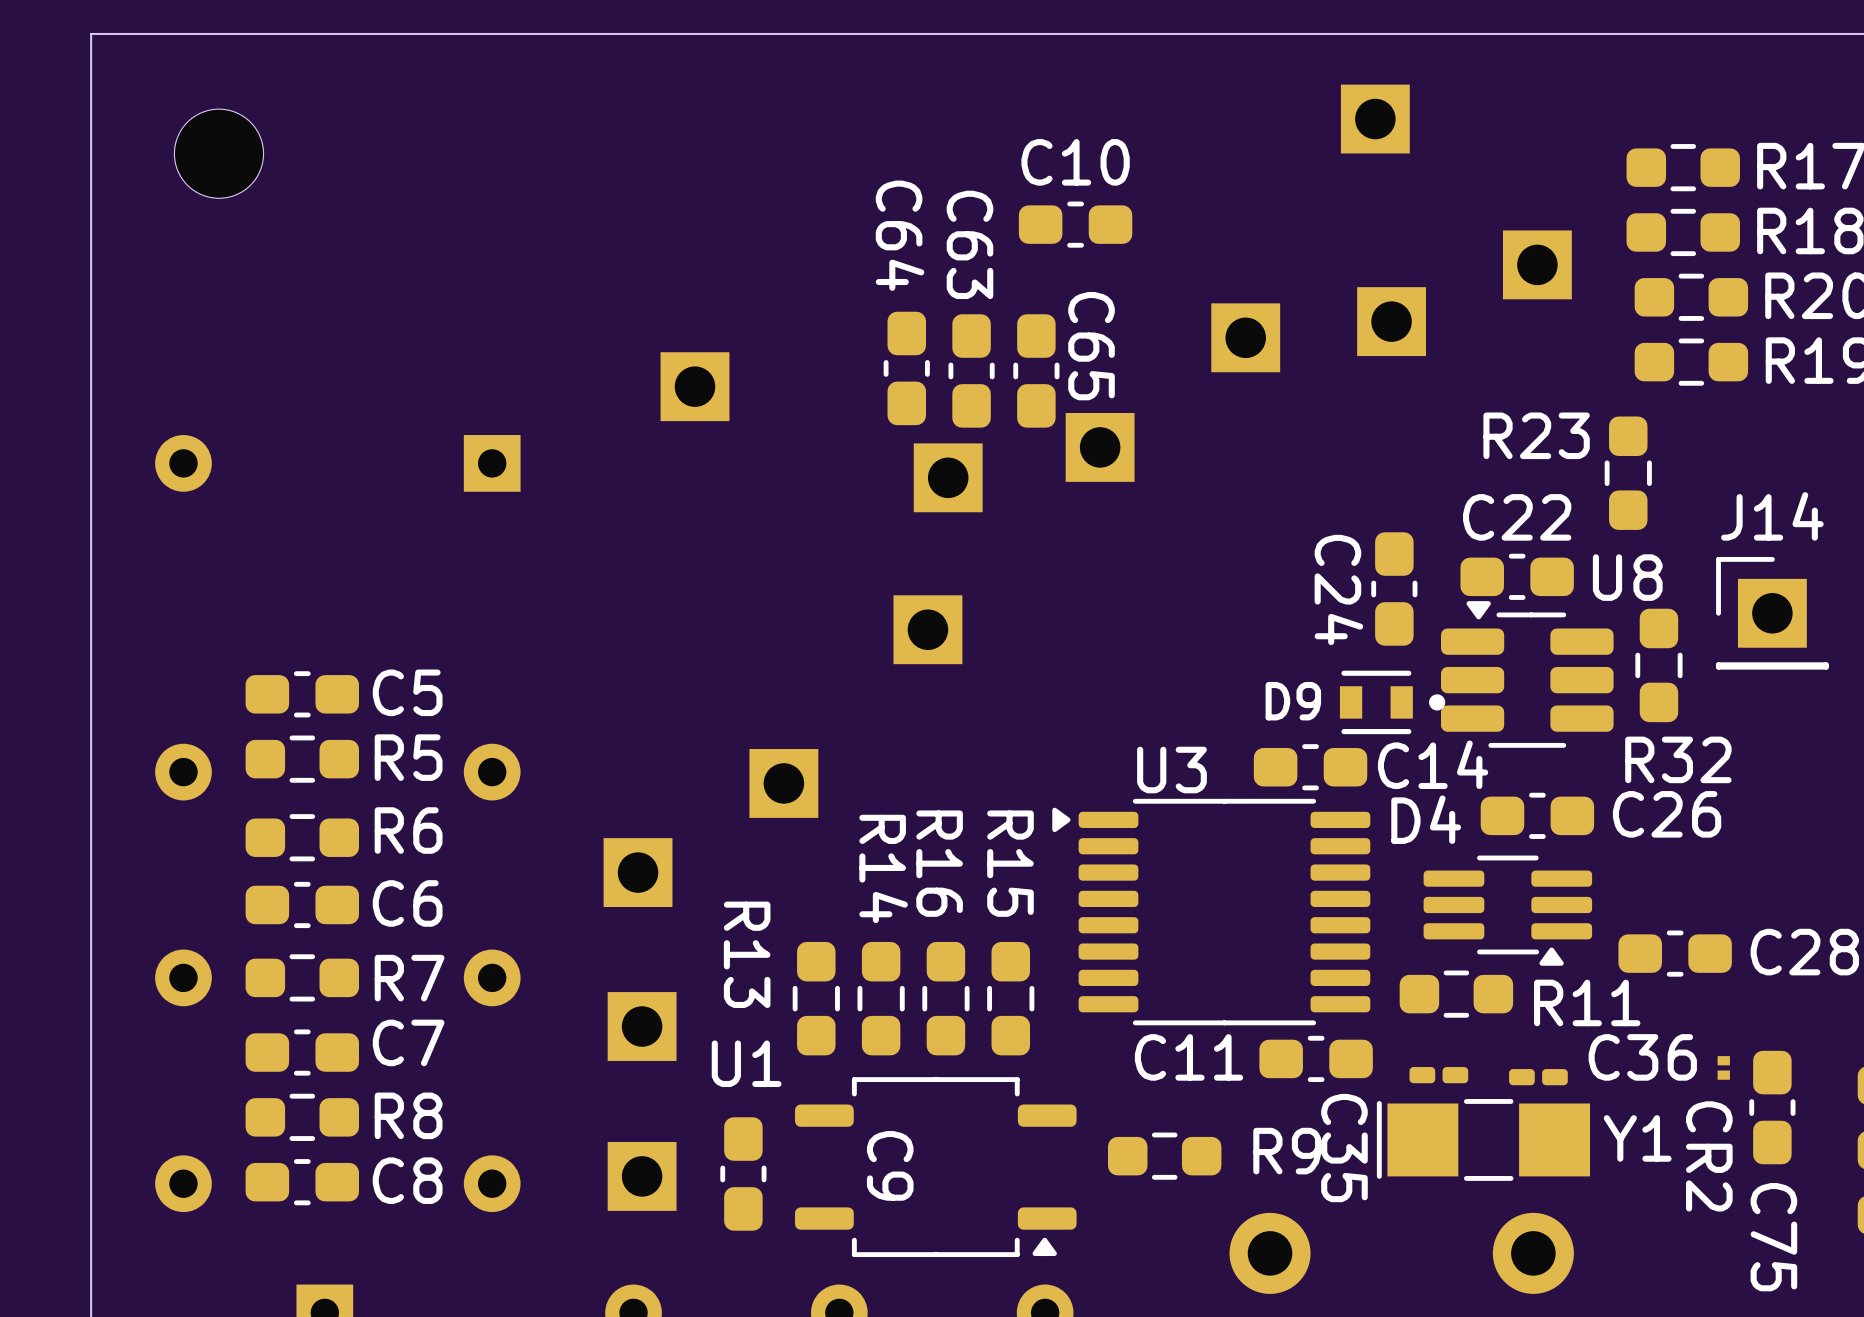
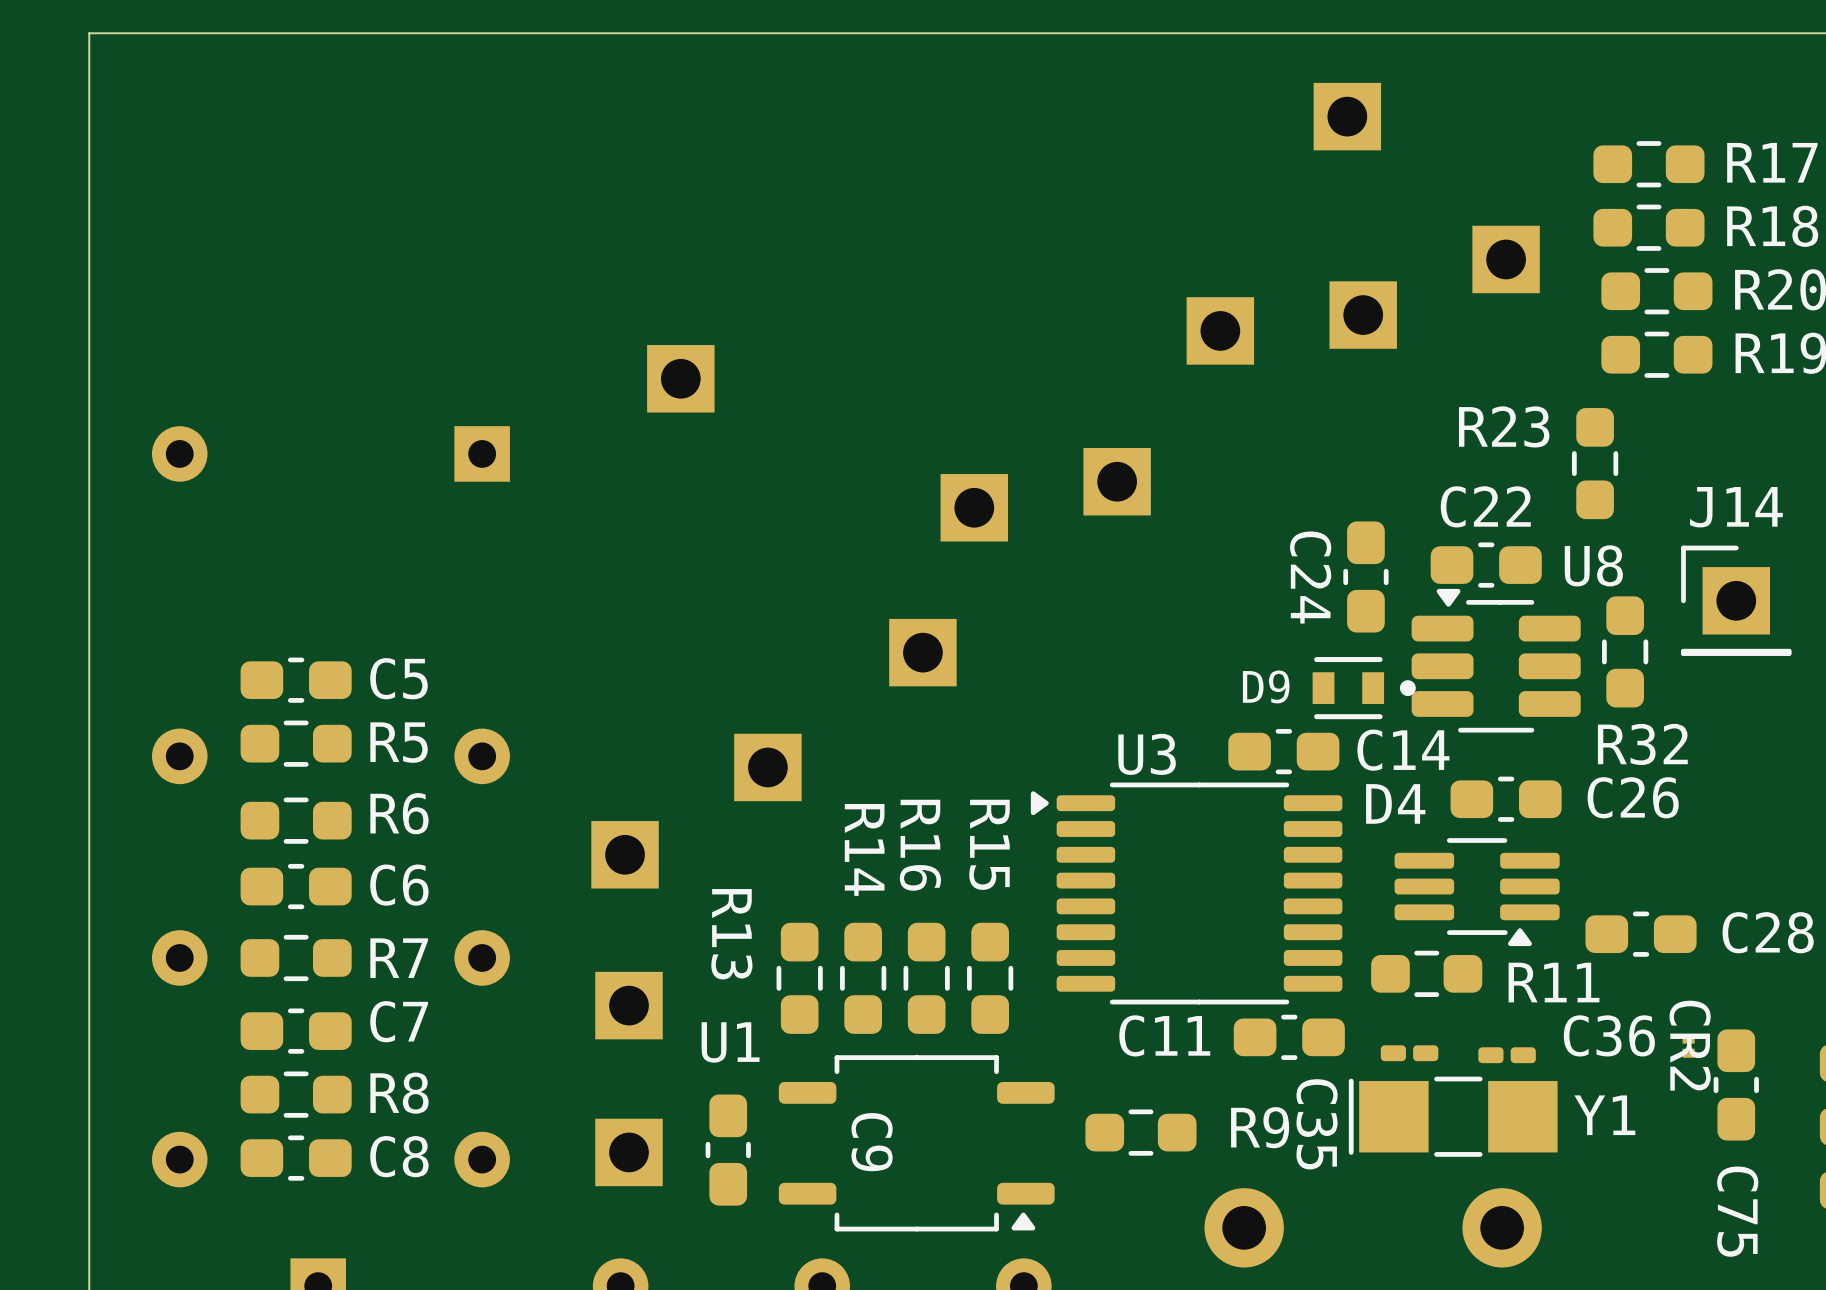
part: (218, 153) -> none
C10: (1075, 224) -> none
C64: (906, 368) -> none
C63: (971, 370) -> none
C65: (1036, 370) -> none
part position: (1100, 447) -> (1117, 481)
part position: (948, 477) -> (974, 507)
part position: (927, 629) -> (922, 652)
CR2 name position: CR2 (1709, 1156) -> CR2 (1690, 1045)

